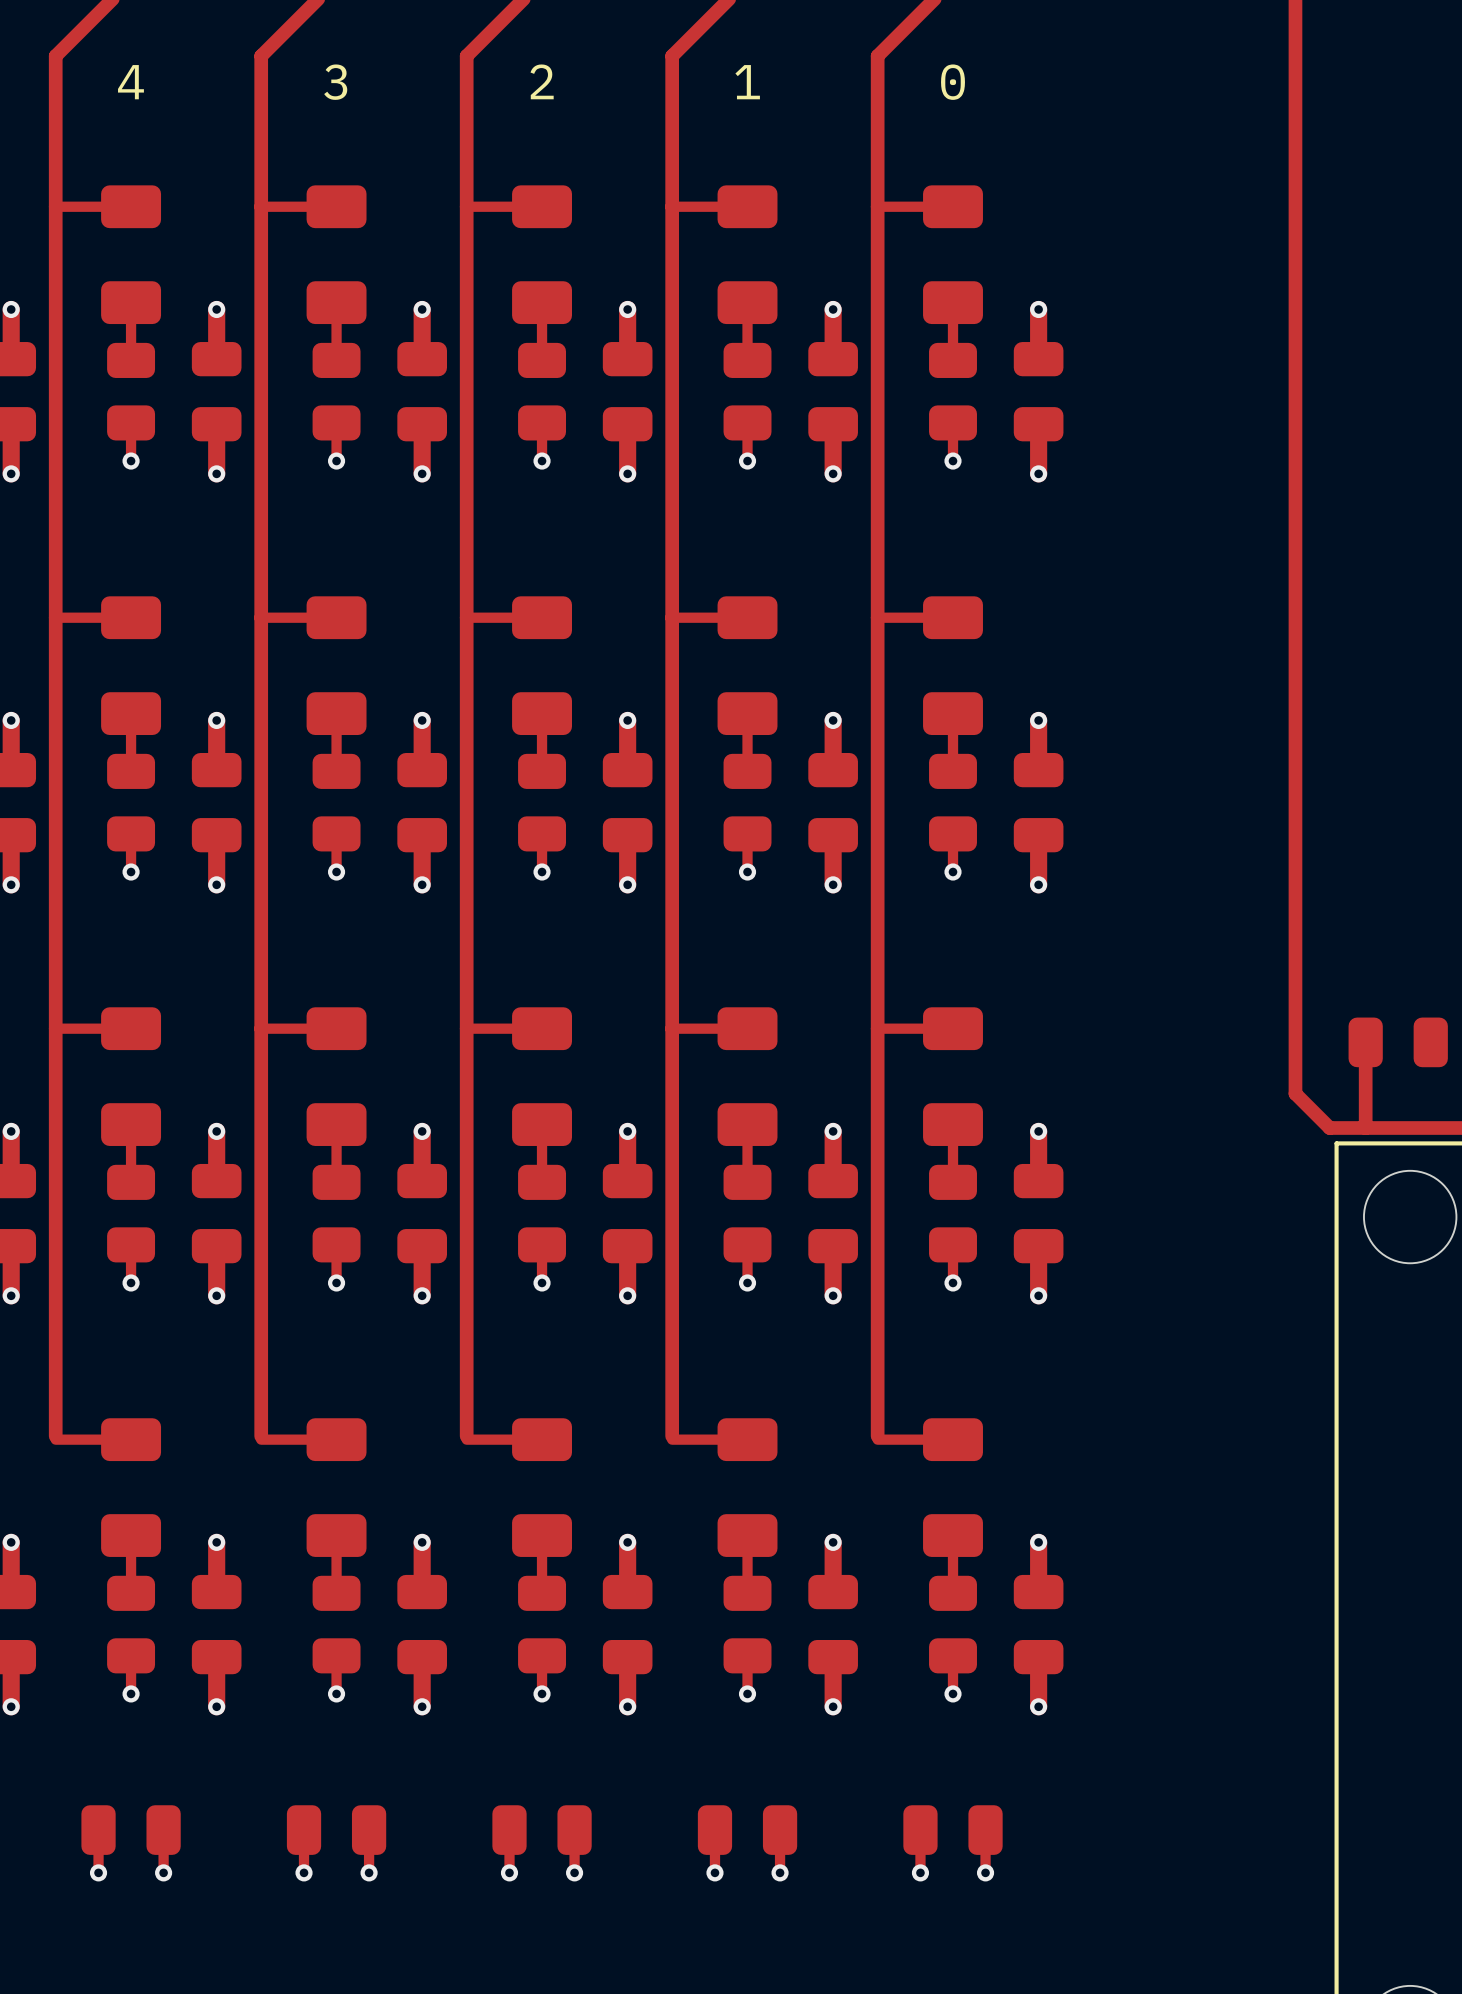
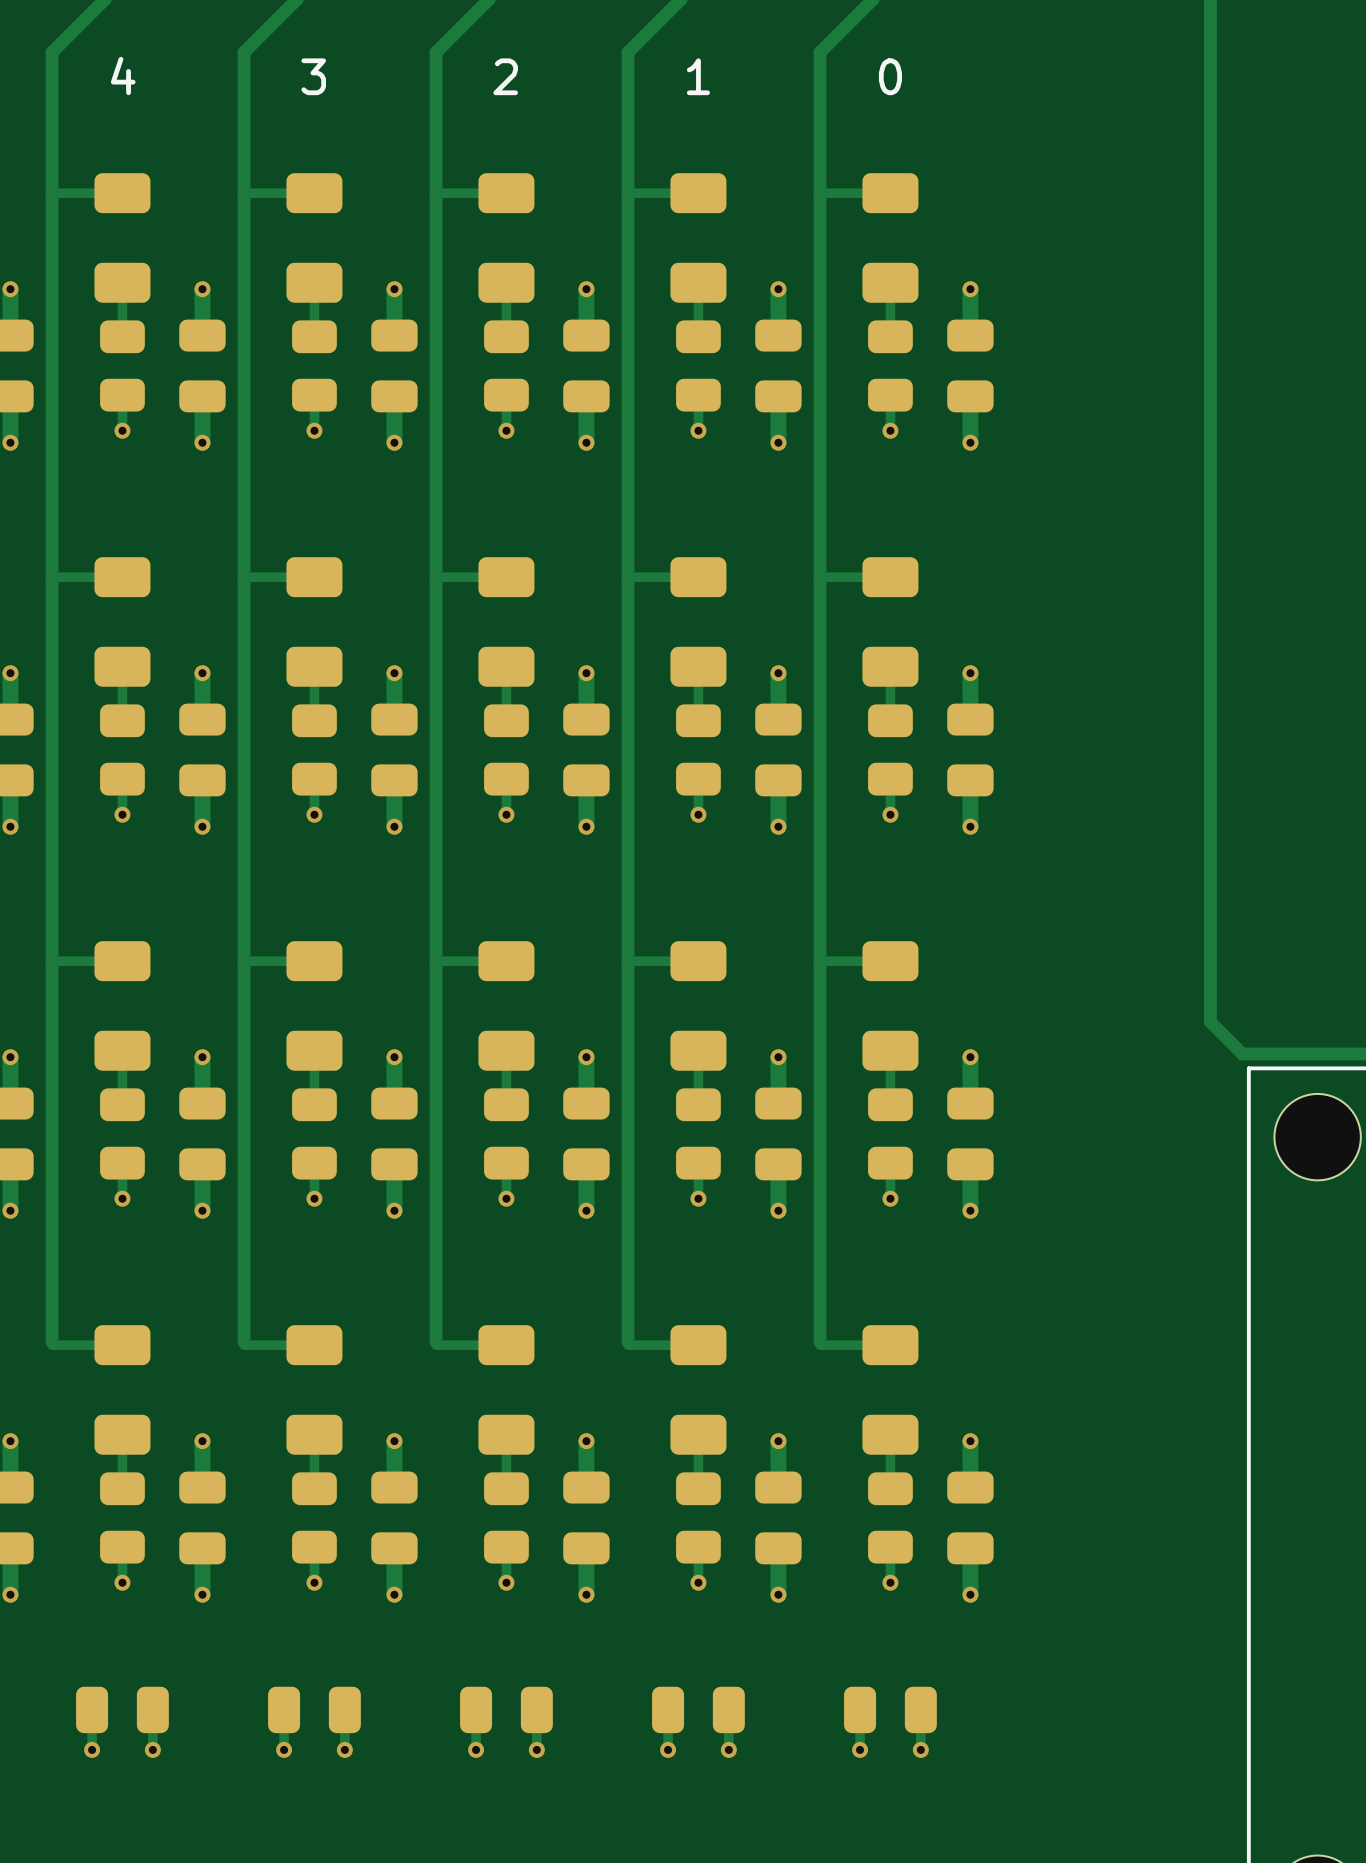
track: (1365, 1042) (1365, 1128) -> none
part: (1398, 1042) -> none

